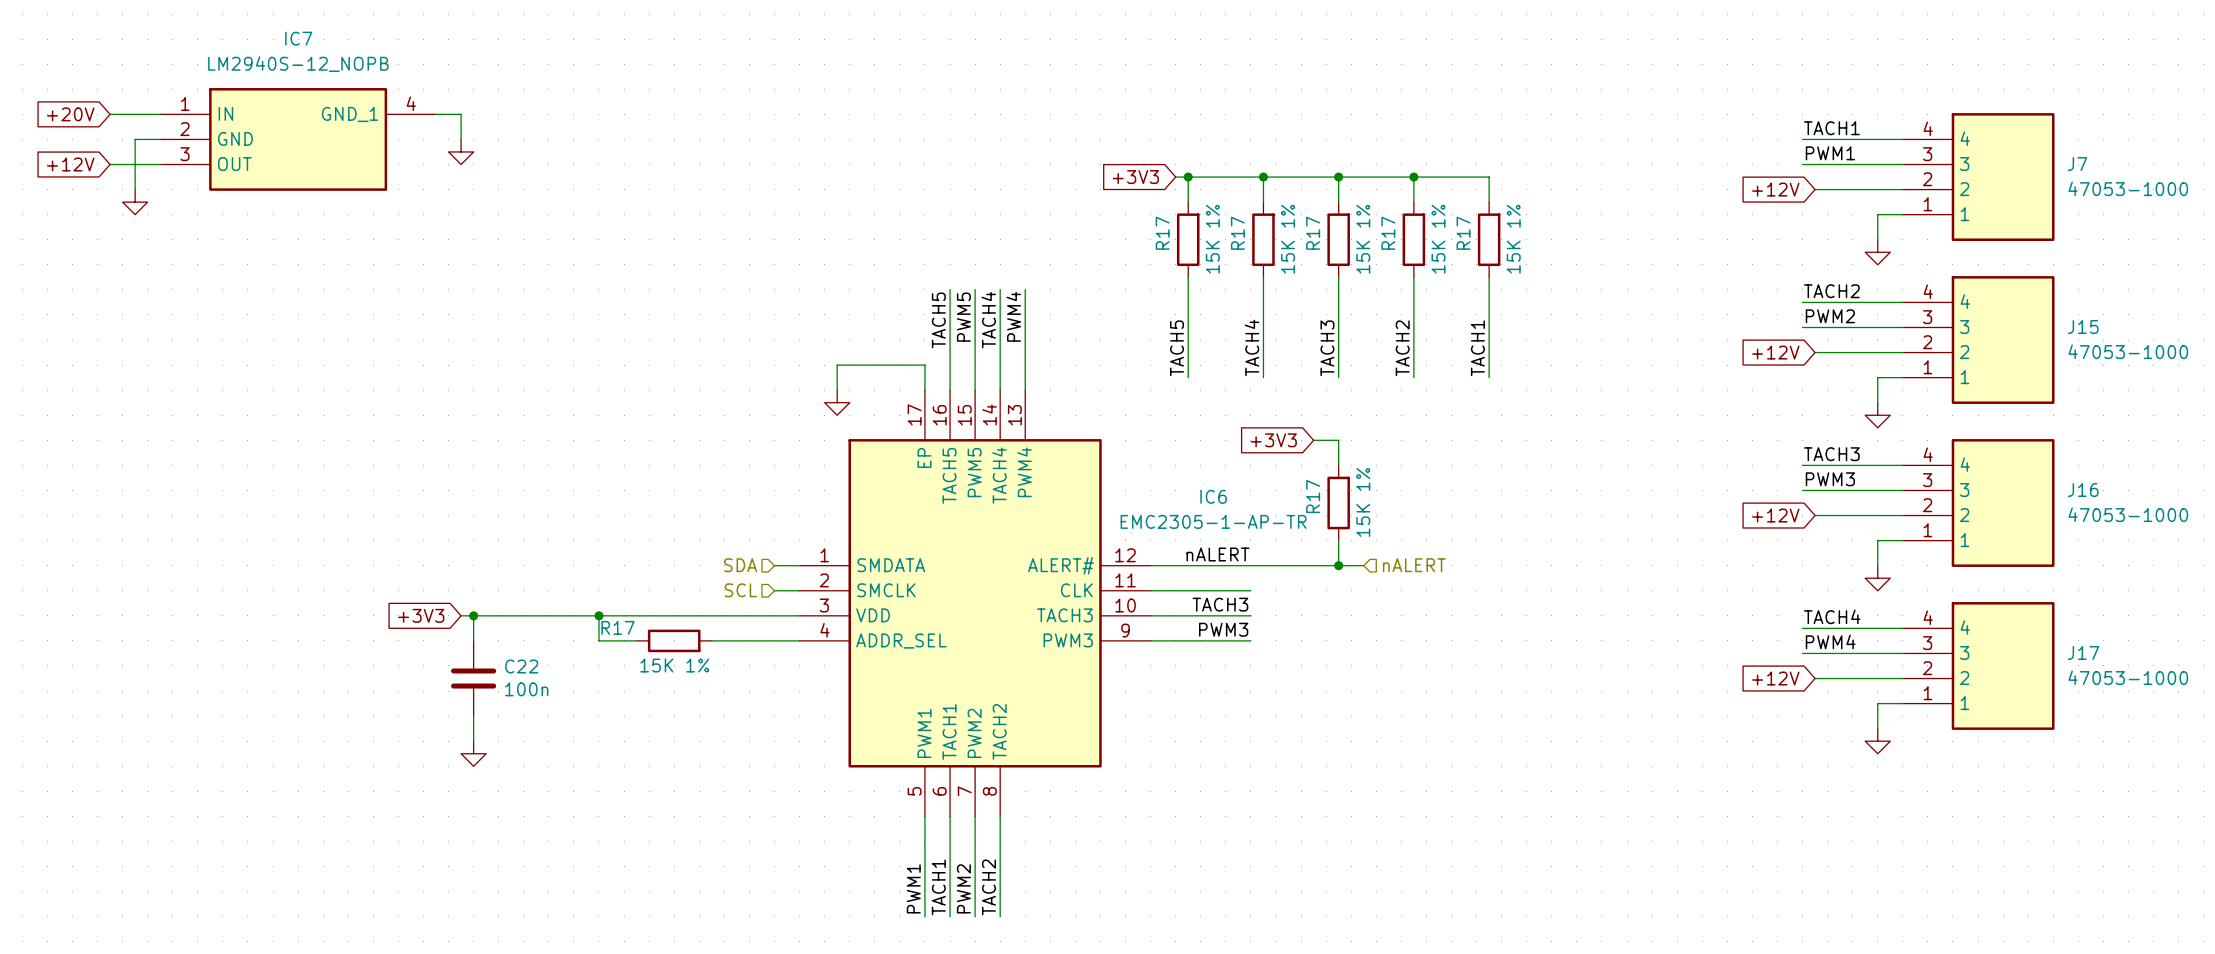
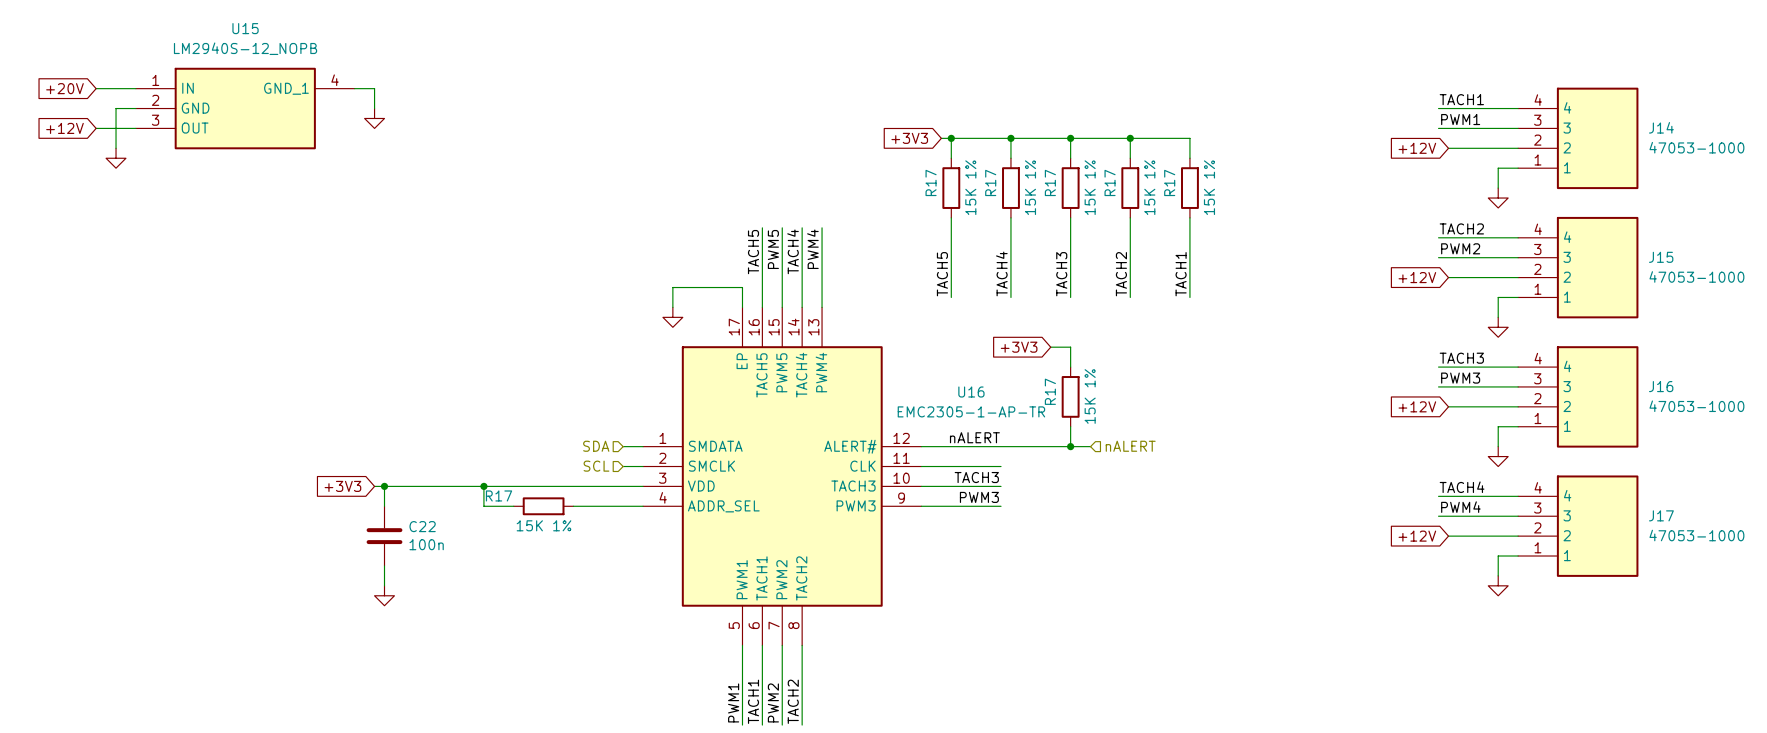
IC7 name: IC7 (298, 38) -> U15 (245, 28)
J7 name: J7 (2077, 164) -> J14 (1661, 127)
IC6 name: IC6 (1213, 496) -> U16 (971, 392)

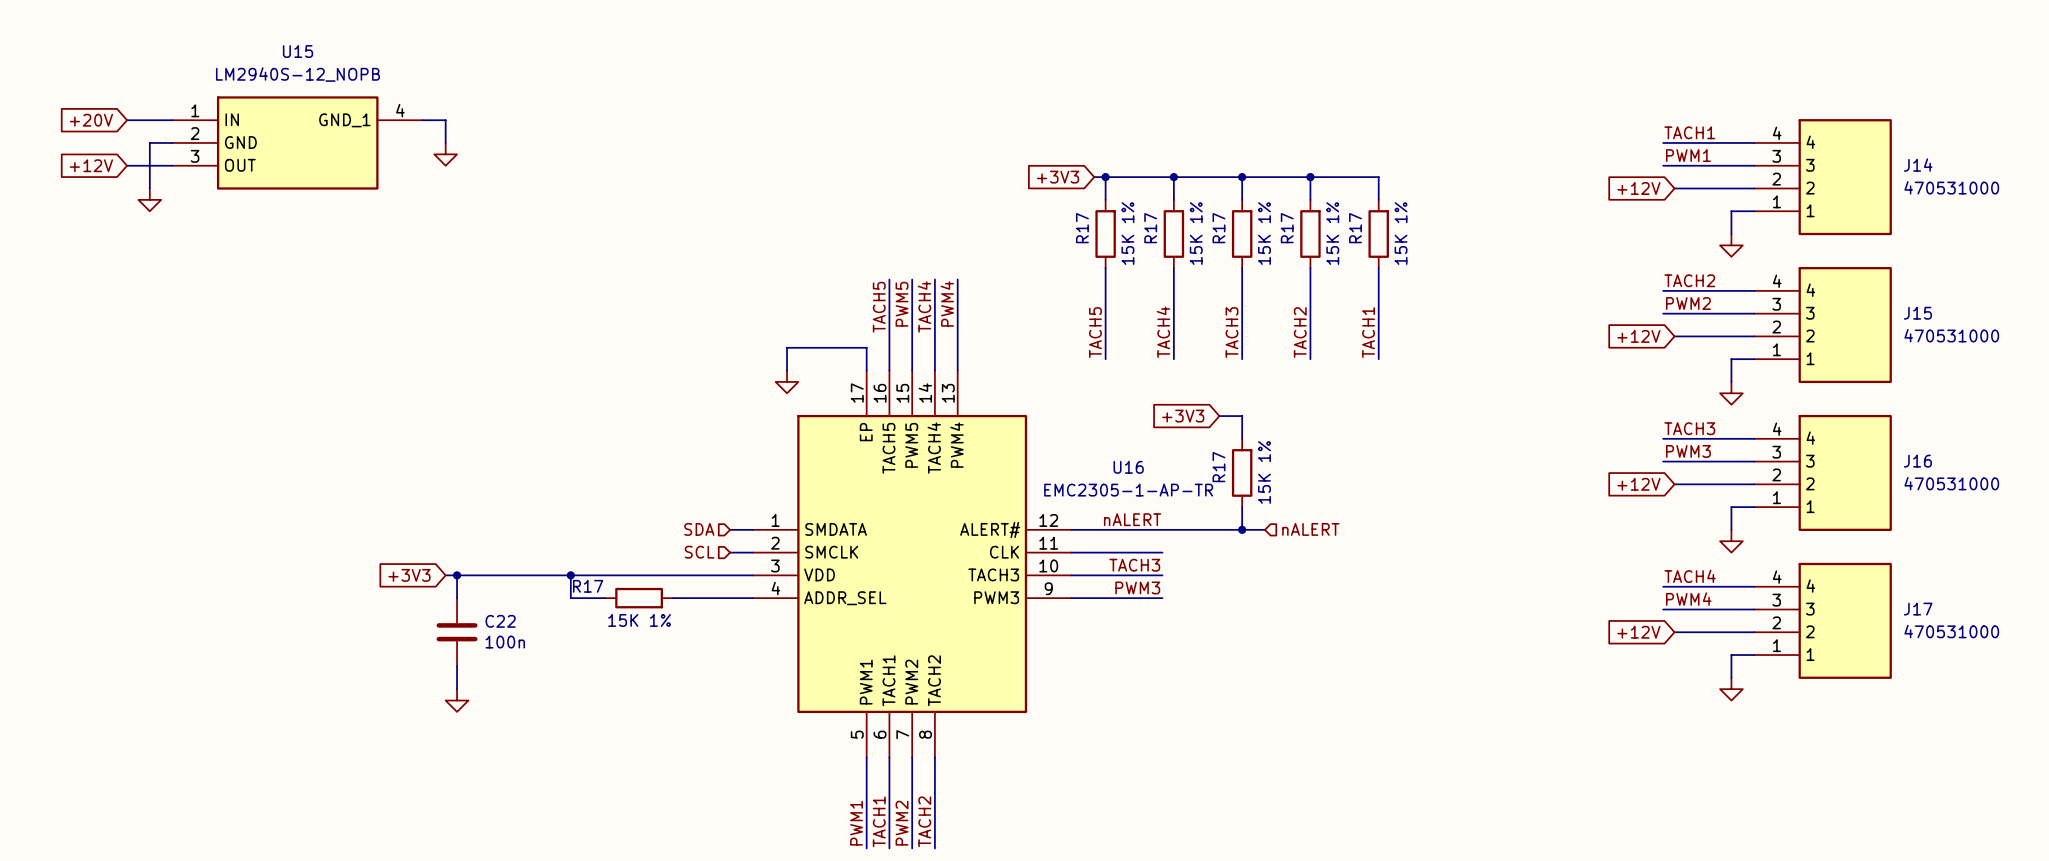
J14 value: 47053-1000 (1696, 147) -> 470531000 (1951, 187)
J15 value: 47053-1000 (1696, 276) -> 470531000 (1951, 335)
J16 value: 47053-1000 (1696, 406) -> 470531000 (1951, 483)
J17 value: 47053-1000 (1696, 535) -> 470531000 (1951, 631)

